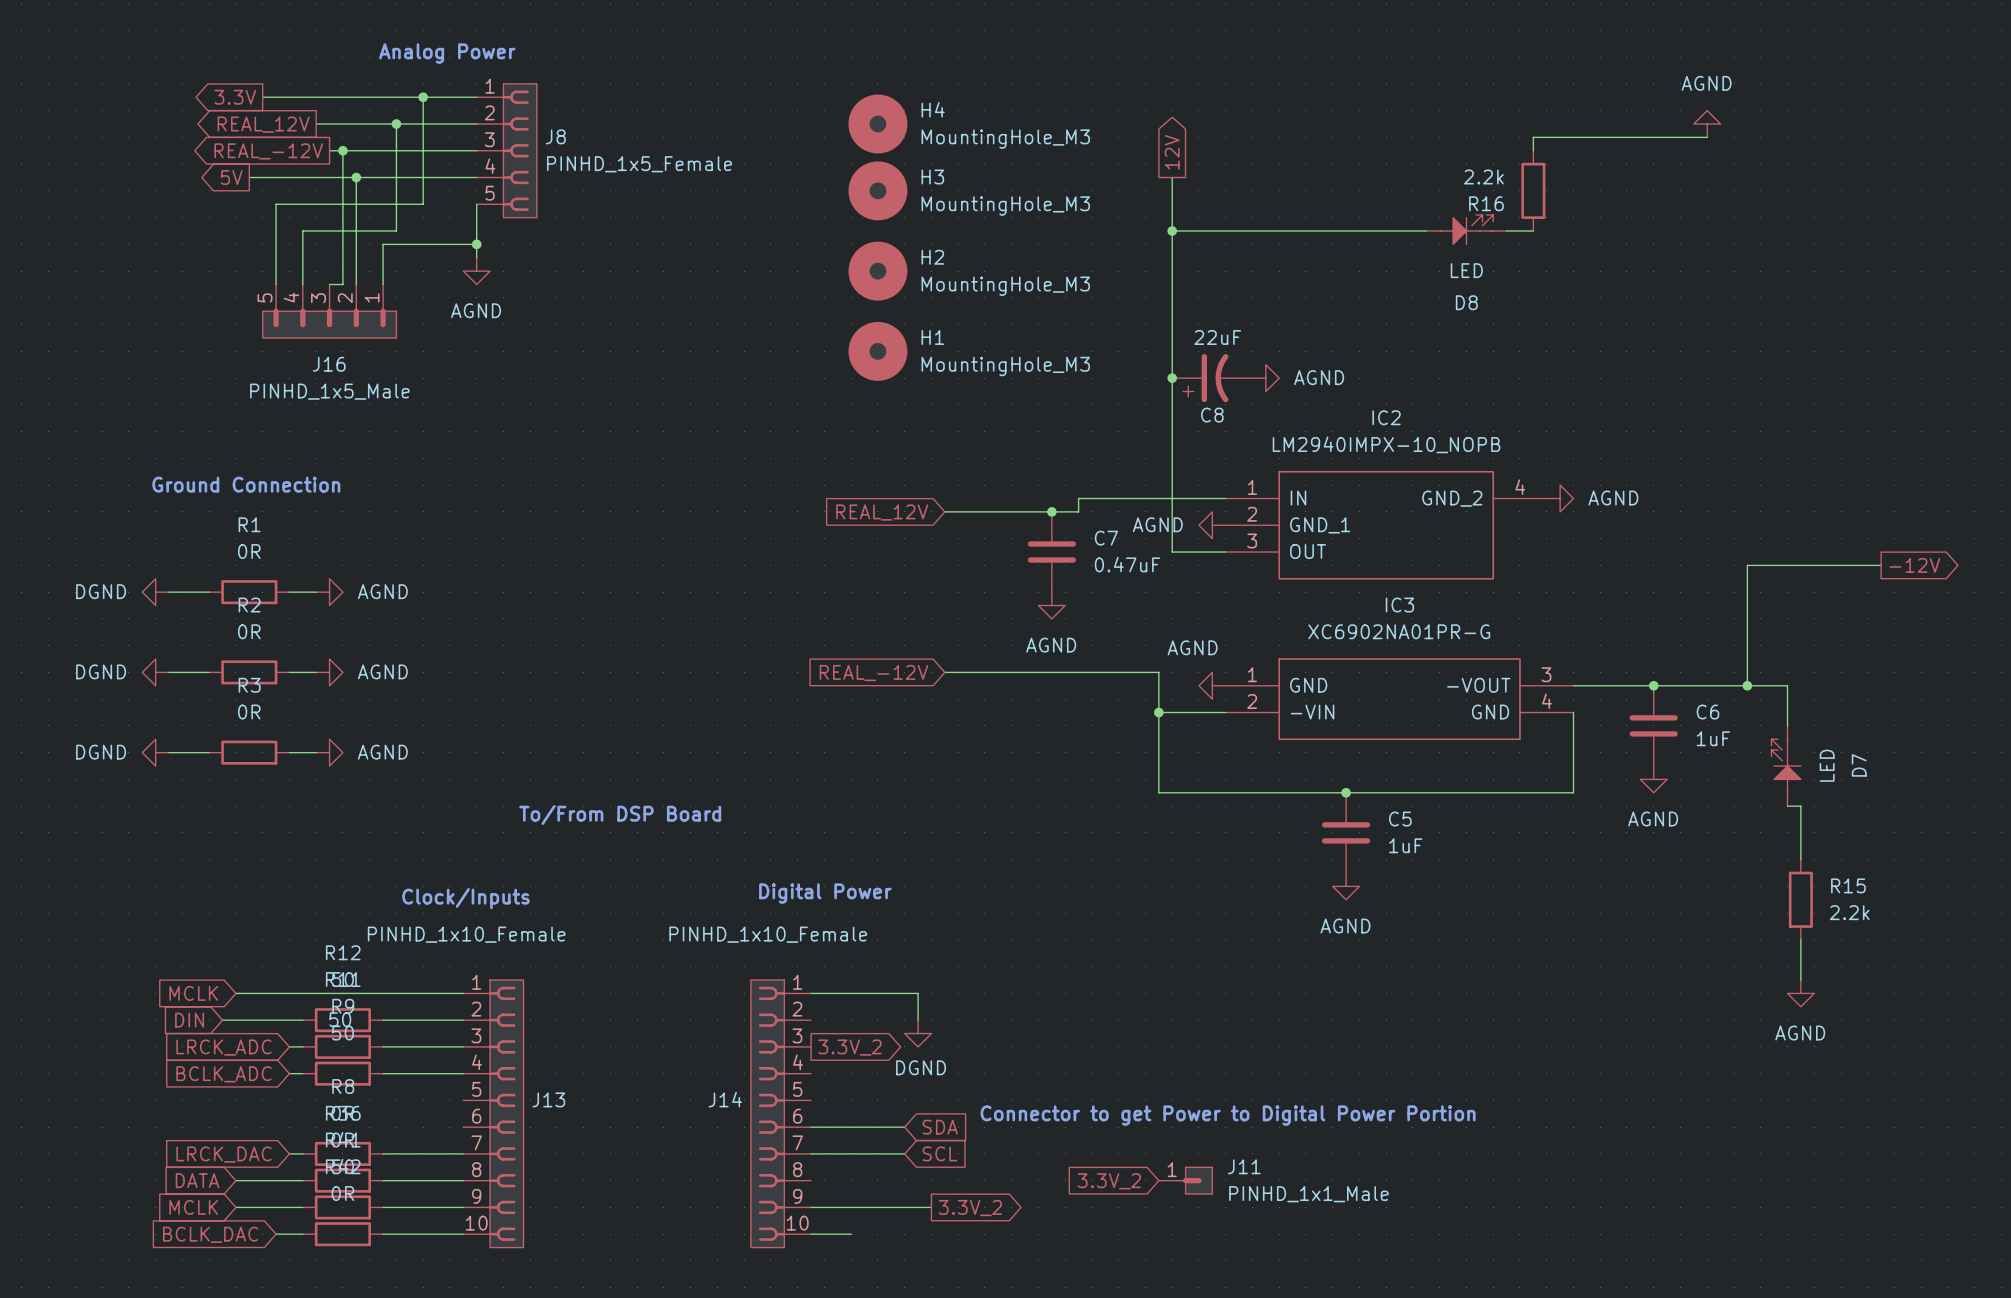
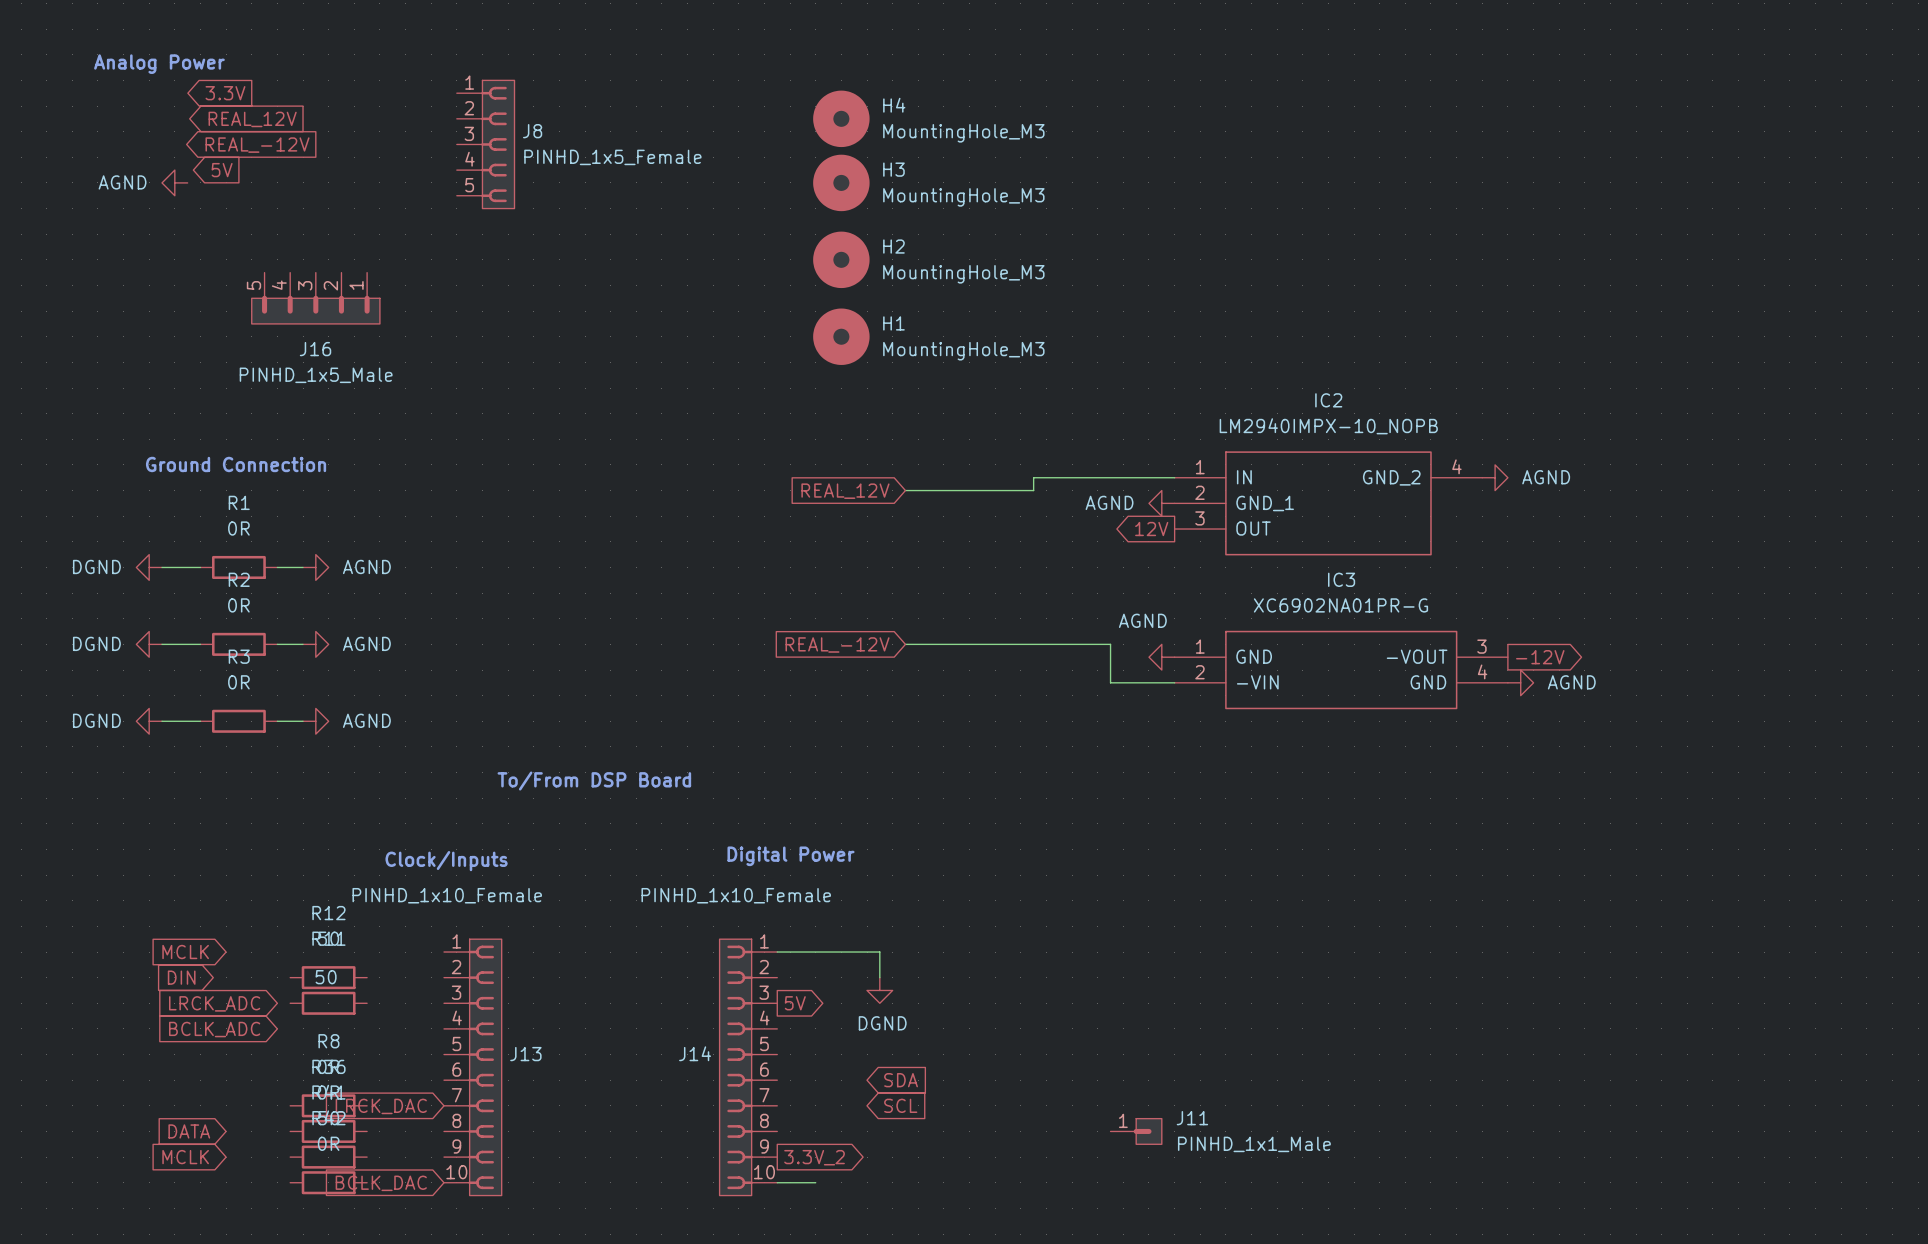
text: Analog Power (447, 53) -> none
text: none -> Analog Power (159, 64)
wire: (262, 97) (476, 97) -> none
wire: (423, 97) (423, 204) (276, 204) (276, 284) -> none
junction: (423, 97) -> none
wire: (316, 124) (476, 124) -> none
wire: (396, 124) (396, 231) (302, 231) (302, 284) -> none
junction: (396, 124) -> none
power symbol: AGND (1707, 124) -> none
wire: (1707, 137) (1533, 137) (1533, 150) -> none
wire: (329, 150) (476, 150) -> none
wire: (342, 150) (342, 284) (329, 284) -> none
junction: (342, 150) -> none
global label: 12V (1172, 152) -> none
wire: (249, 177) (476, 177) -> none
wire: (356, 177) (356, 284) -> none
junction: (356, 177) -> none
wire: (1172, 177) (1172, 552) (1225, 552) -> none
power symbol: none -> AGND (174, 182)
R16: 2.2k (1533, 190) -> none
wire: (476, 204) (476, 257) -> none
D8: LED (1466, 229) -> none
wire: (1172, 231) (1426, 231) -> none
junction: (1172, 231) -> none
wire: (1506, 231) (1533, 231) -> none
wire: (476, 244) (383, 244) (383, 284) -> none
junction: (476, 244) -> none
power symbol: AGND (476, 271) -> none
junction: (1172, 378) -> none
C8: 22uF (1212, 378) -> none
power symbol: AGND (1265, 378) -> none
junction: (1051, 511) -> none
C7: 0.47uF (1051, 552) -> none
global label: none -> 12V (1151, 529)
wire: (1881, 565) (1747, 565) (1747, 685) -> none
global label: -12V (1914, 565) -> none
power symbol: AGND (1051, 605) -> none
wire: (1573, 685) (1787, 685) (1787, 725) -> none
global label: none -> -12V (1540, 657)
junction: (1653, 685) -> none
junction: (1747, 685) -> none
wire: (1158, 712) (1158, 792) (1573, 792) (1573, 712) -> none
junction: (1158, 712) -> none
C6: 1uF (1653, 725) -> none
D7: LED (1786, 766) -> none
power symbol rotation: 0° (1653, 779) -> 90° counterclockwise (1520, 682)
power symbol position: AGND (1653, 779) -> AGND (1520, 682)
junction: (1346, 792) -> none
wire: (1787, 806) (1800, 806) (1800, 859) -> none
C5: 1uF (1346, 832) -> none
power symbol: AGND (1346, 886) -> none
R15: 2.2k (1800, 899) -> none
wire: (1800, 939) (1800, 980) -> none
wire: (235, 993) (463, 993) -> none
power symbol: AGND (1800, 993) -> none
wire: (222, 1020) (302, 1020) -> none
wire: (383, 1020) (463, 1020) -> none
wire: (289, 1046) (302, 1046) -> none
wire: (383, 1046) (463, 1046) -> none
global label: 3.3V_2 (849, 1047) -> 5V (795, 1003)
wire: (289, 1073) (302, 1073) -> none
R9: 50 (342, 1073) -> none
wire: (383, 1073) (463, 1073) -> none
text: Connector to get Power to Digital Power Portion (1228, 1115) -> none
wire: (811, 1127) (904, 1127) -> none
wire: (289, 1153) (302, 1153) -> none
wire: (383, 1153) (463, 1153) -> none
wire: (811, 1153) (904, 1153) -> none
global label position: LRCK_DAC (223, 1154) -> LRCK_DAC (381, 1106)
wire: (235, 1180) (302, 1180) -> none
wire: (383, 1180) (463, 1180) -> none
global label: 3.3V_2 (1109, 1181) -> none
wire: (235, 1207) (302, 1207) -> none
wire: (383, 1207) (463, 1207) -> none
wire: (811, 1207) (931, 1207) -> none
global label position: 3.3V_2 (970, 1208) -> 3.3V_2 (814, 1157)
global label position: BCLK_DAC (210, 1234) -> BCLK_DAC (381, 1183)
wire: (276, 1234) (302, 1234) -> none
wire: (383, 1234) (463, 1234) -> none

